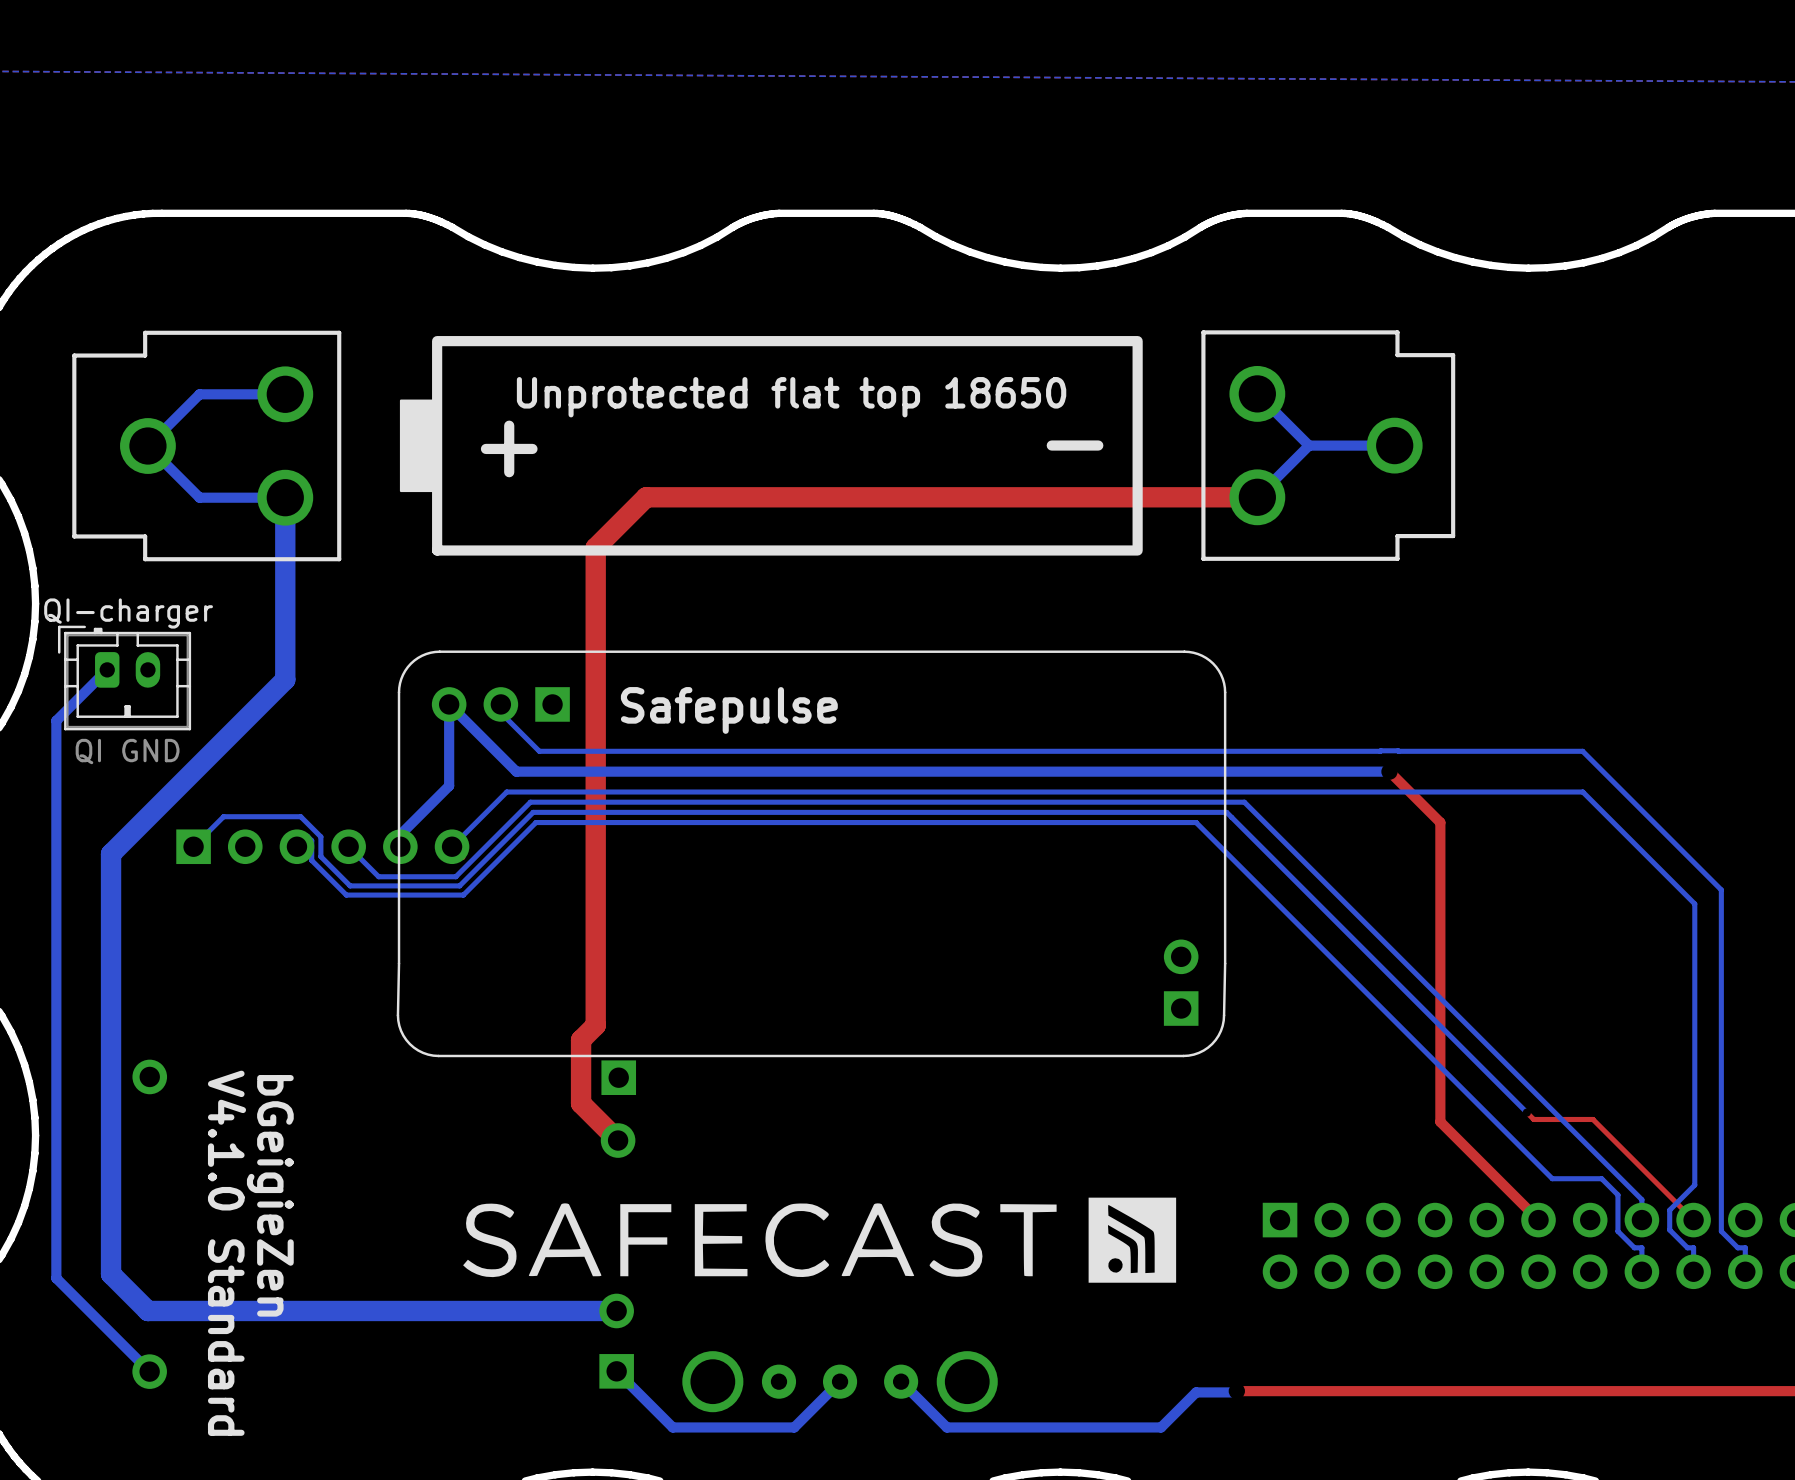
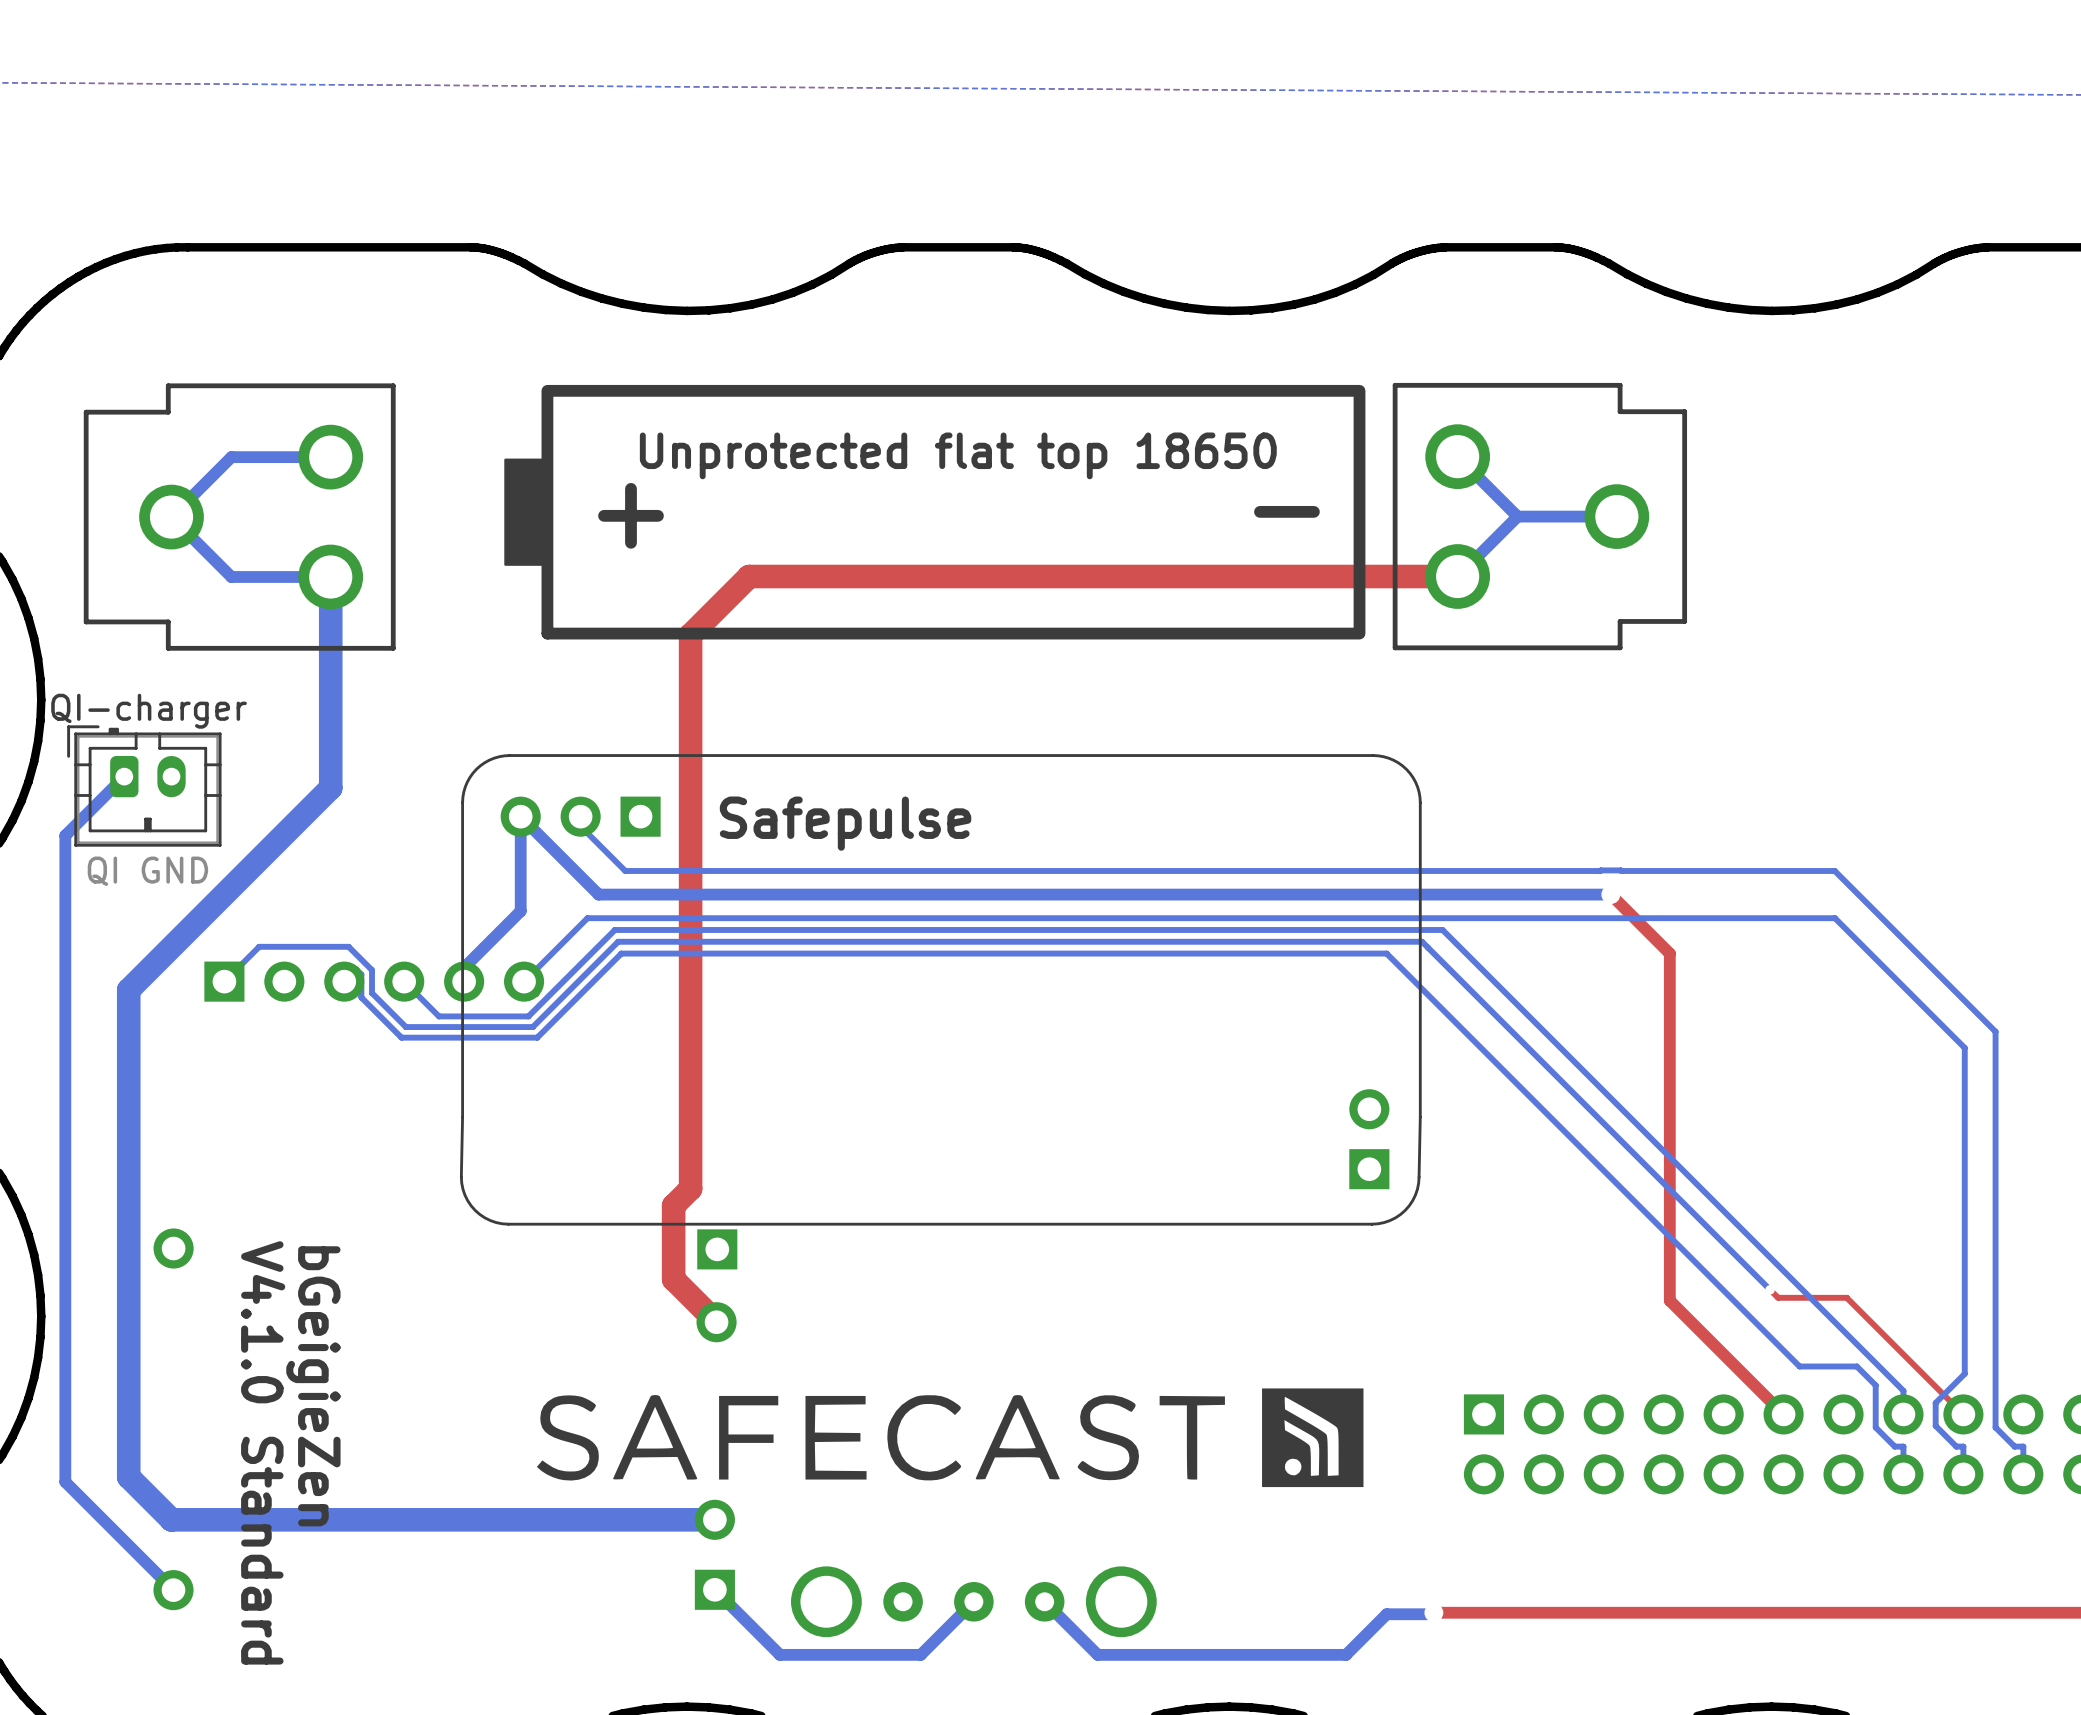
drawing position: (771, 445) -> (934, 512)

